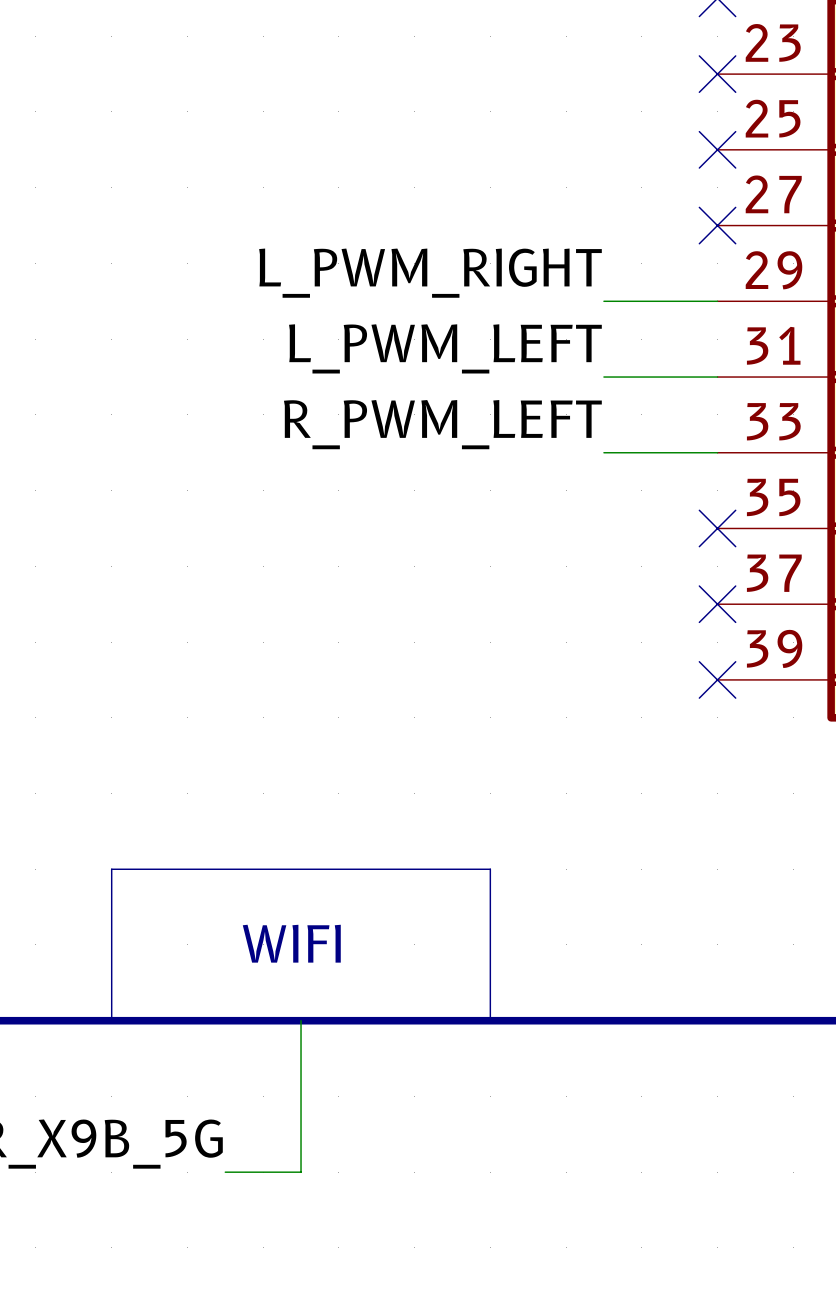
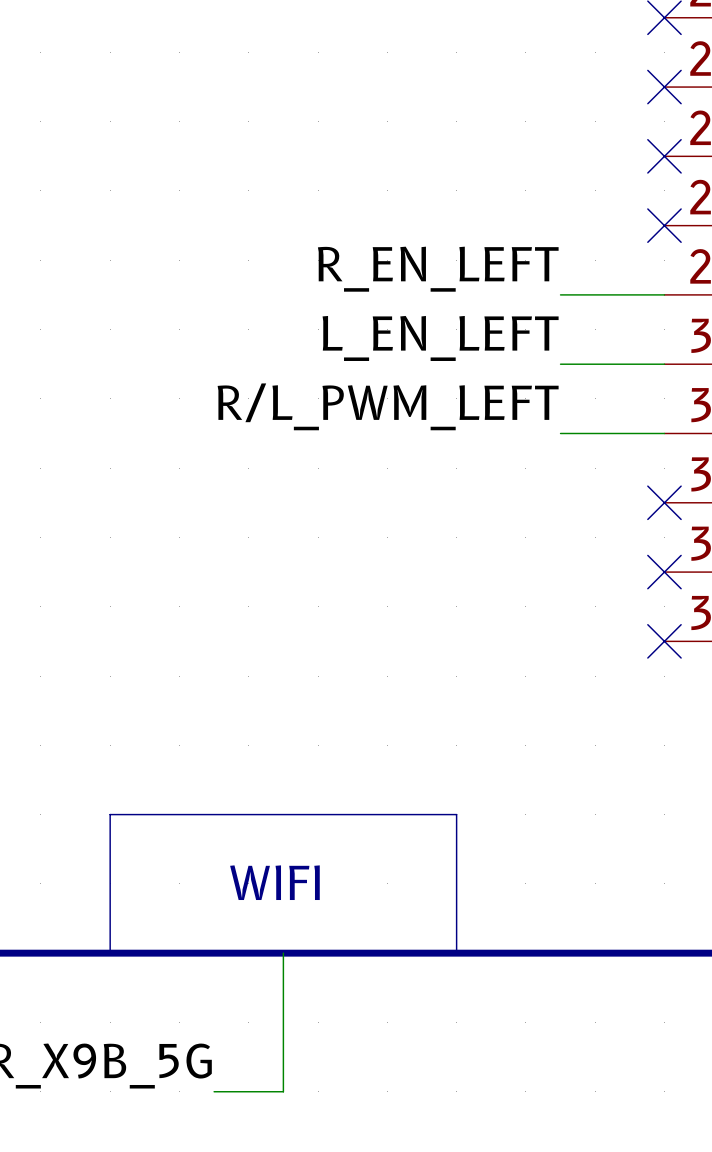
label: L_PWM_RIGHT (430, 273) -> R_EN_LEFT (438, 269)
label: L_PWM_LEFT (445, 348) -> L_EN_LEFT (440, 338)
label: R_PWM_LEFT (442, 424) -> R/L_PWM_LEFT (388, 406)

